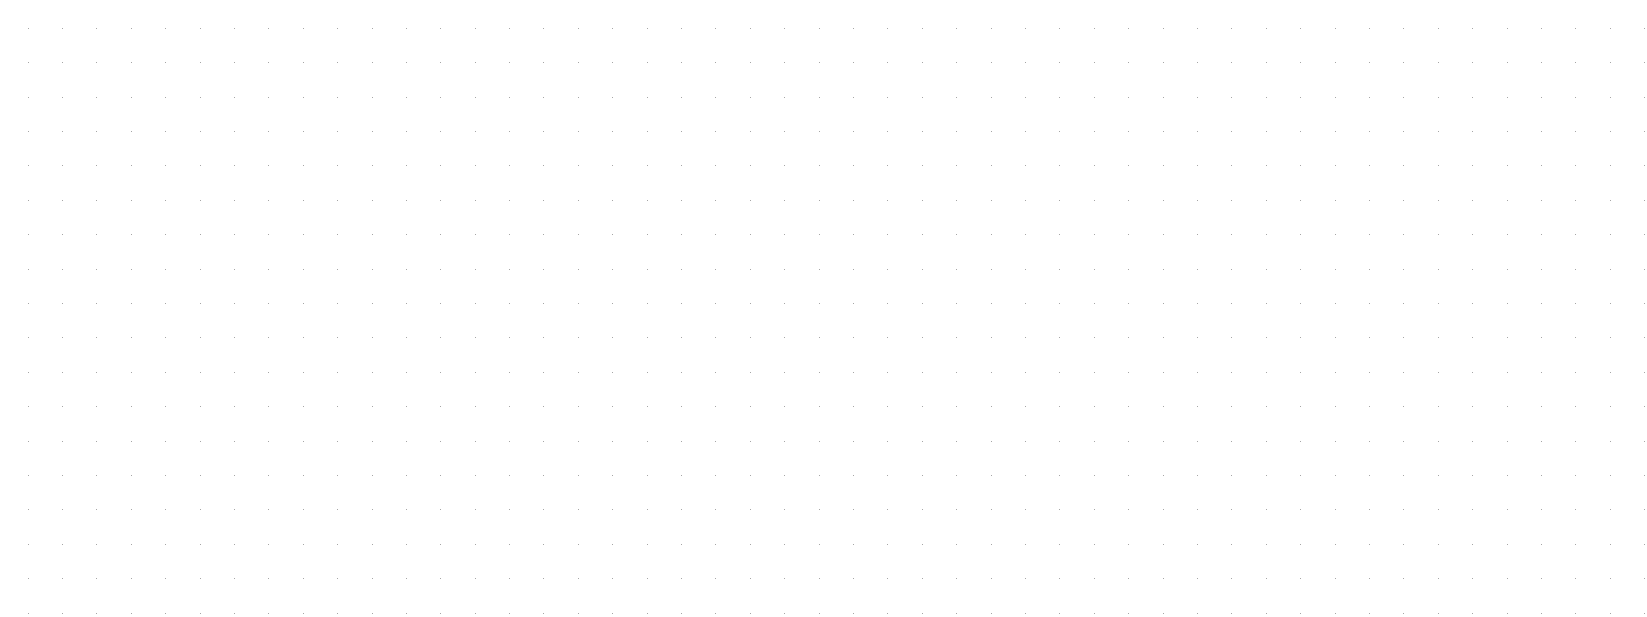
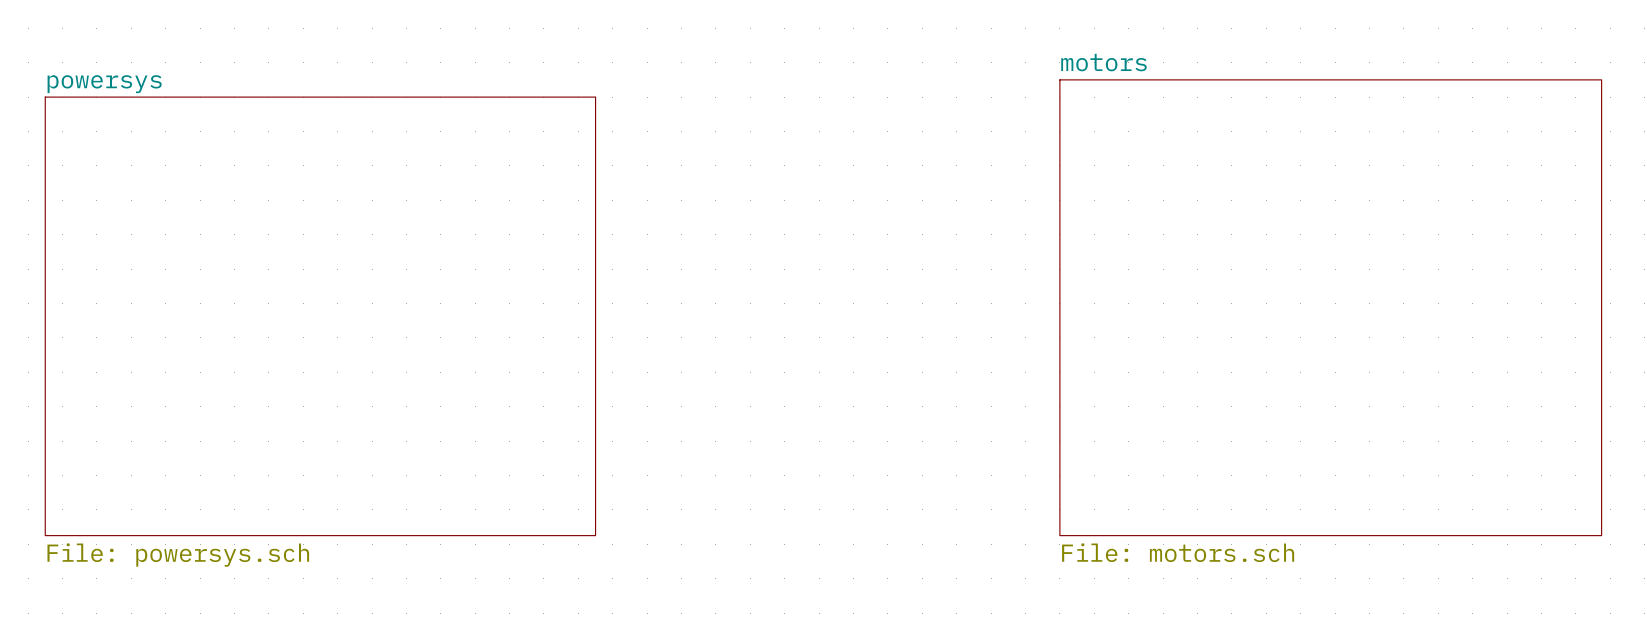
sheet motors: none -> File: motors.sch (1330, 307)
sheet powersys: none -> File: powersys.sch (320, 316)

